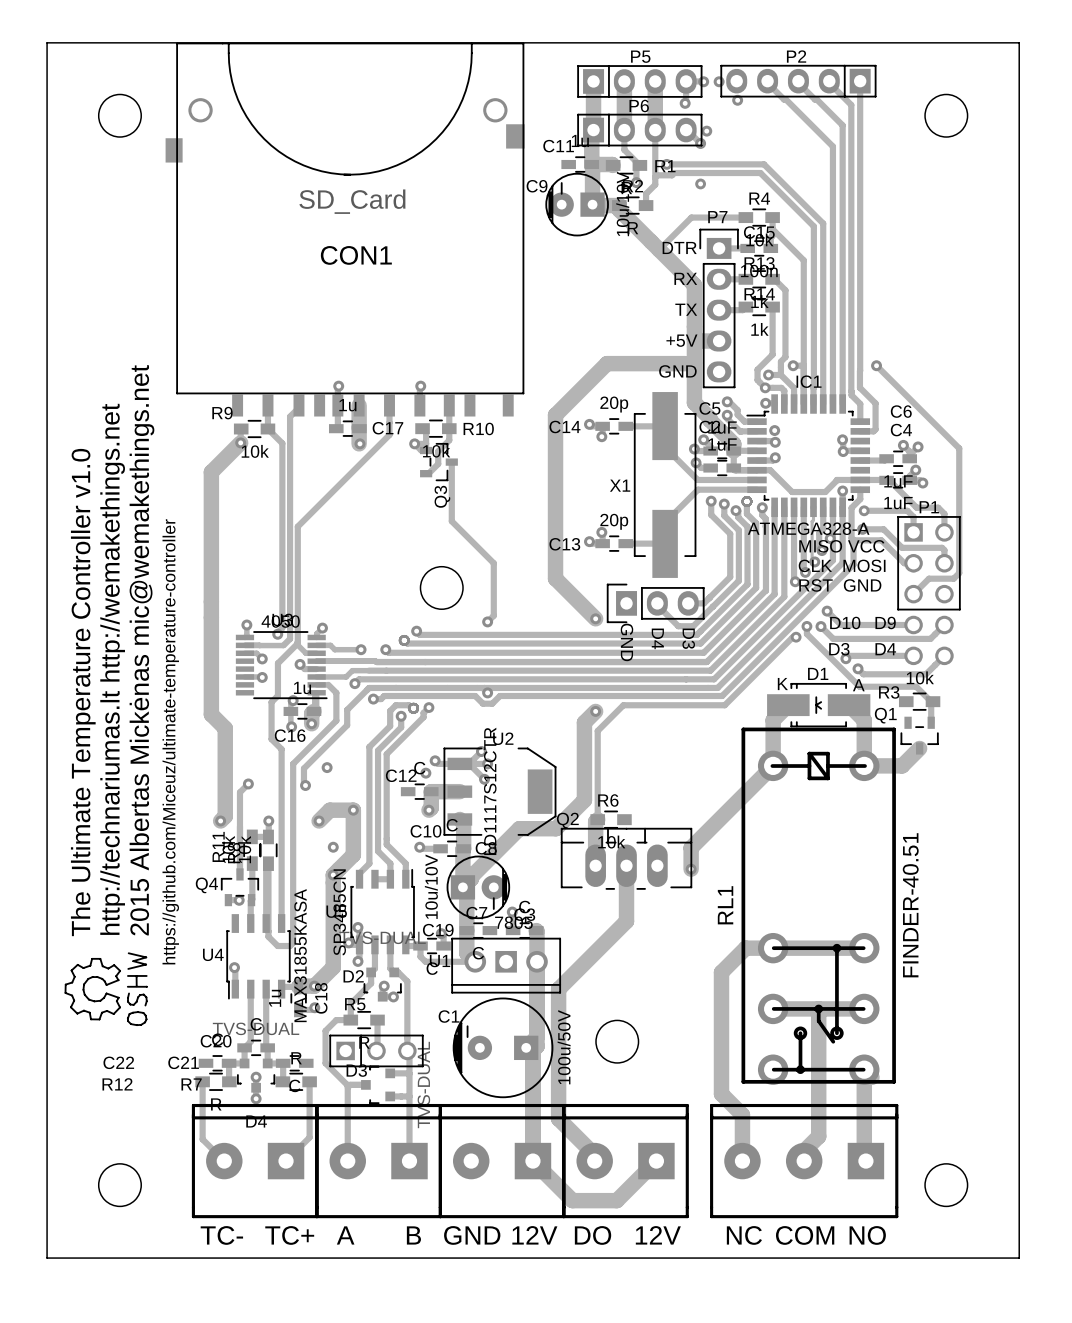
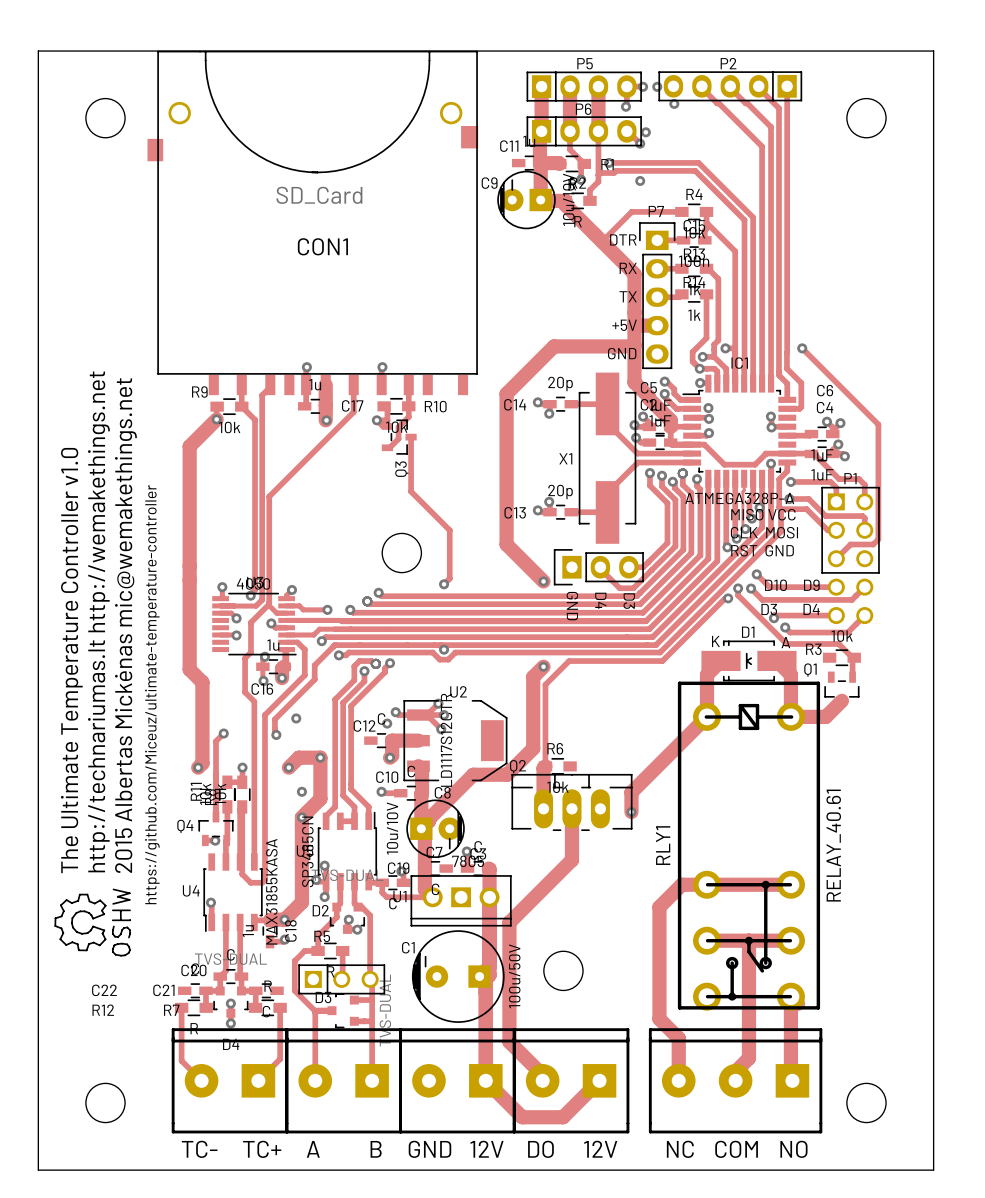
IC1 value: ATMEGA328-A (808, 528) -> ATMEGA328P-A (739, 498)
RL1 name: RL1 (725, 905) -> RLY1 (663, 845)
RL1 value: FINDER-40.51 (910, 905) -> RELAY_40.61 (833, 845)

